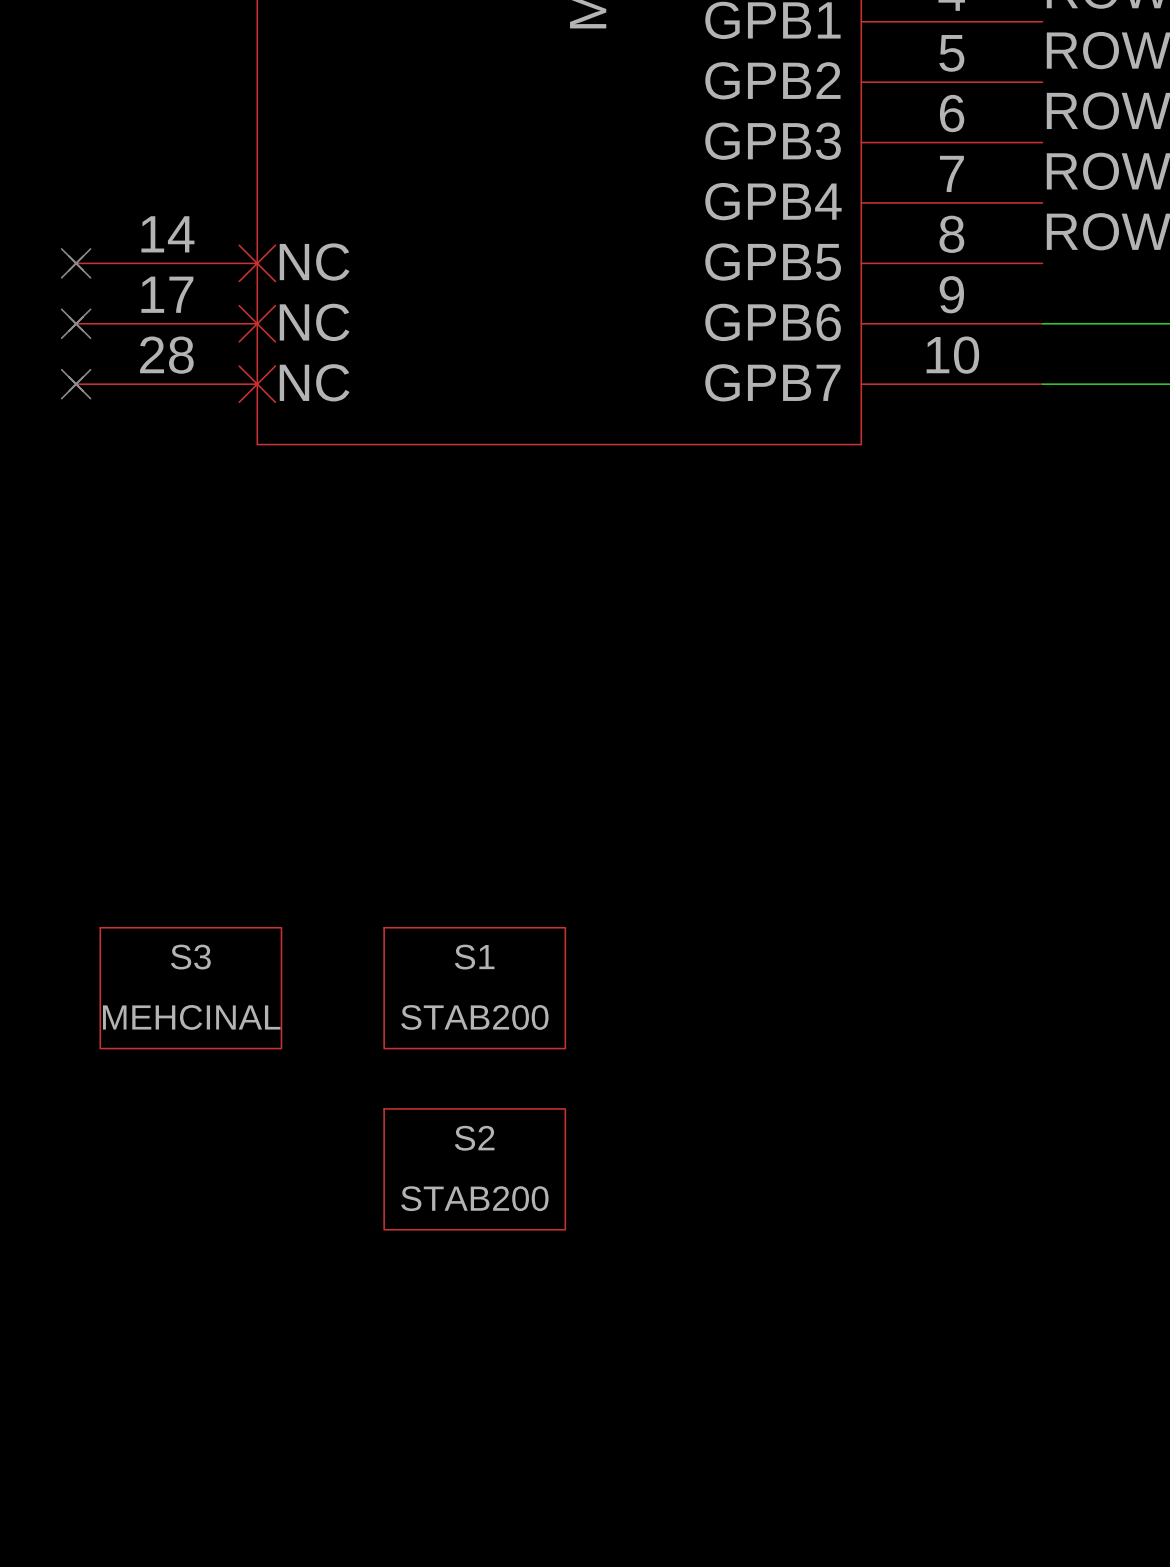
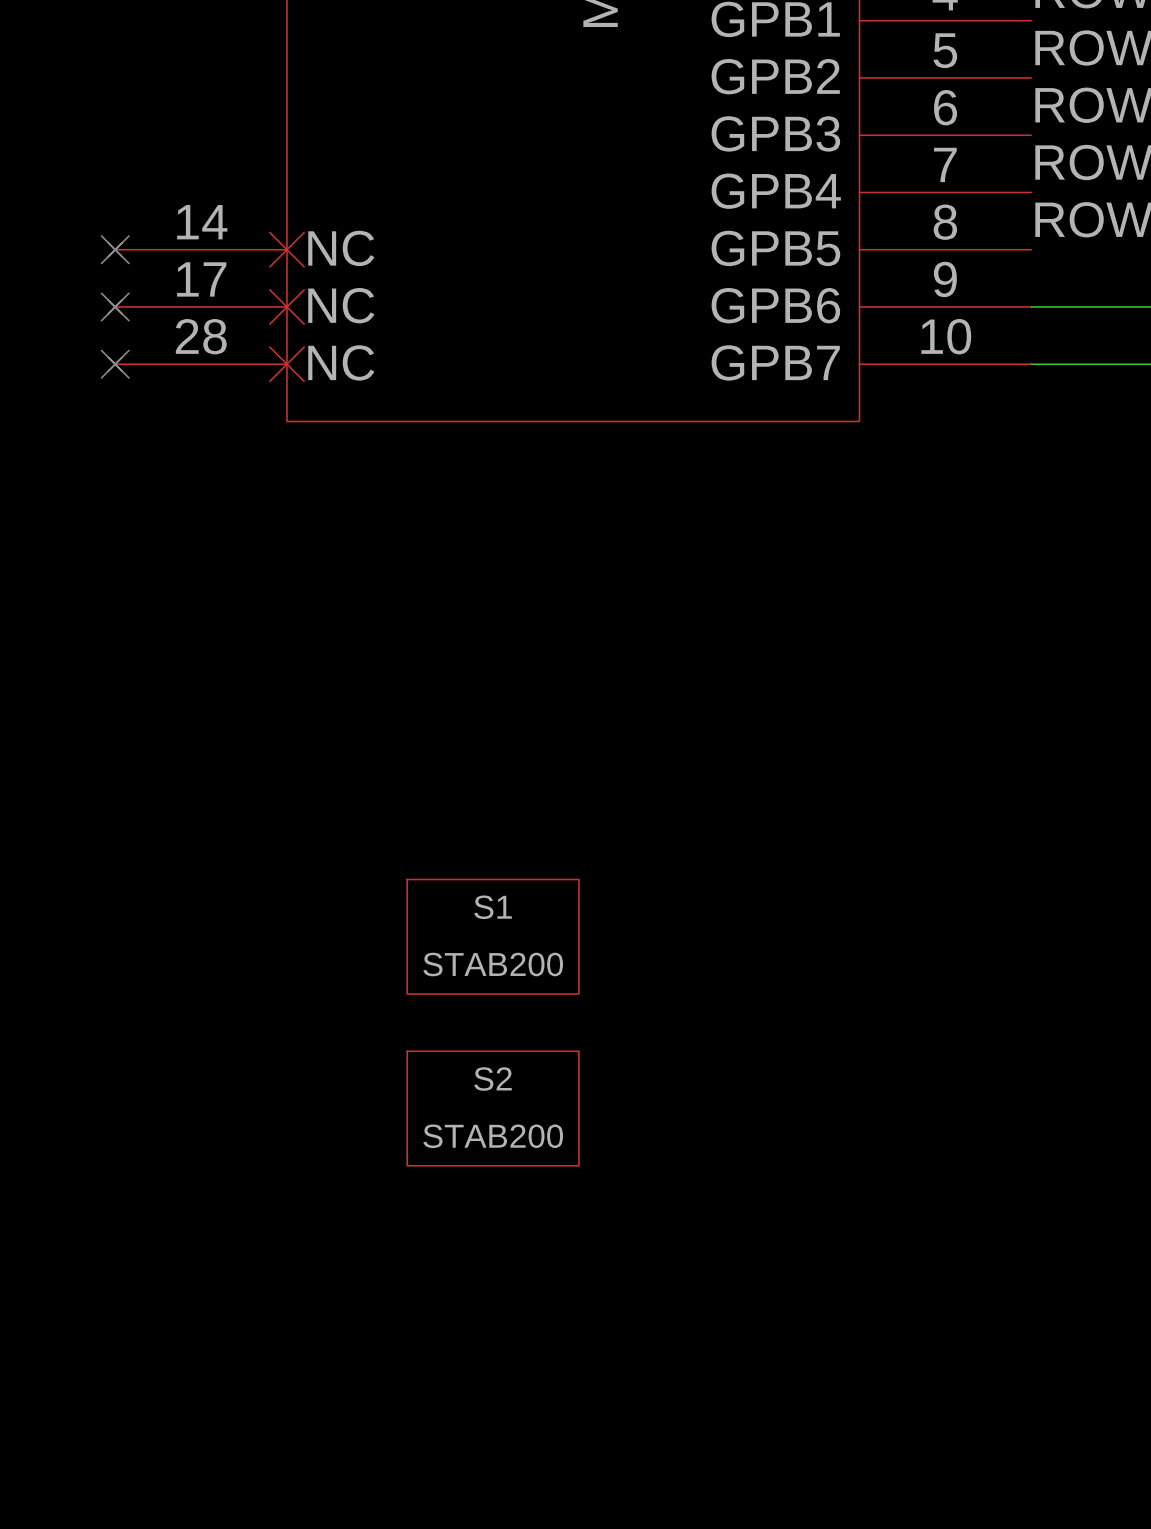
S3: MEHCINAL (190, 988) -> none

